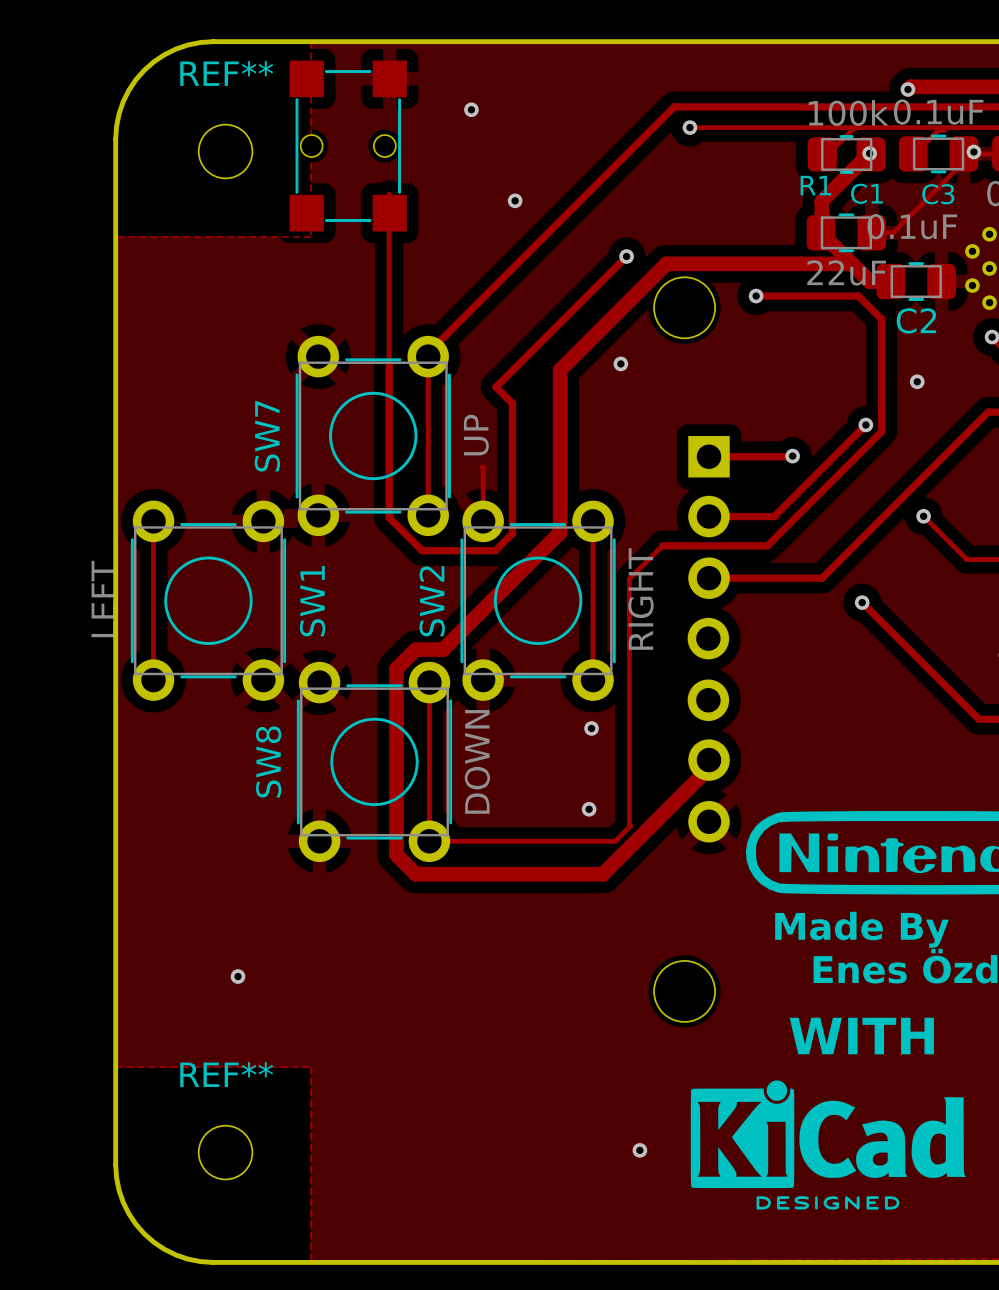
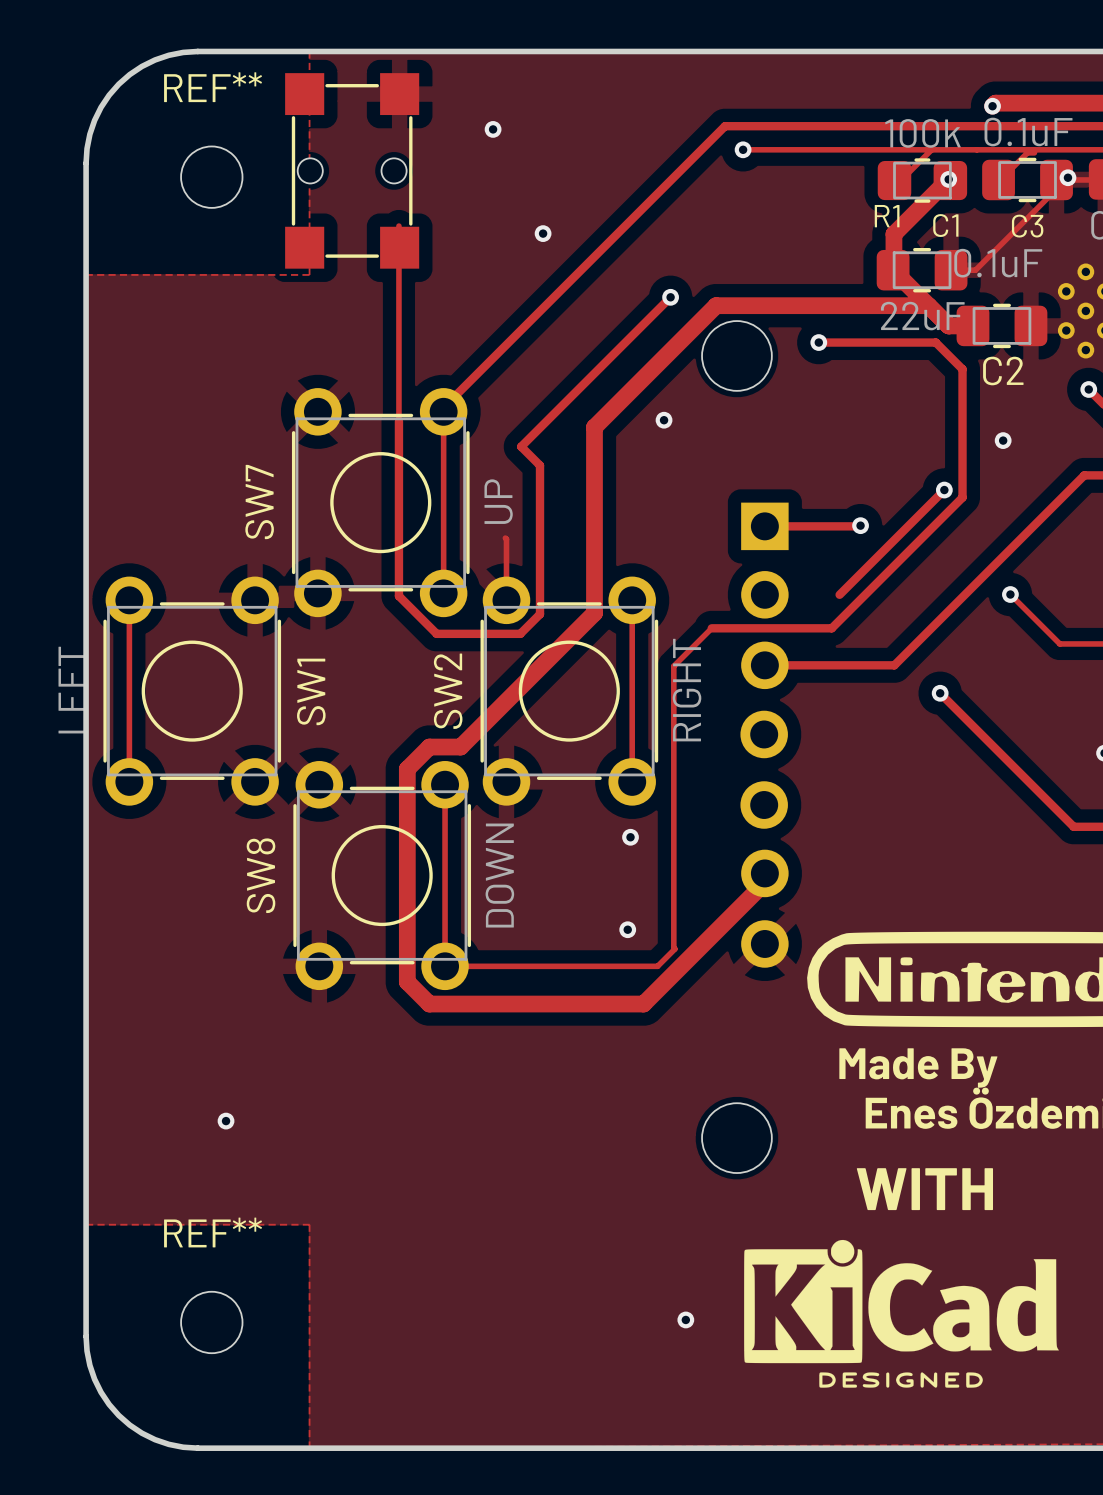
track: (709, 516) (774, 516) -> none

